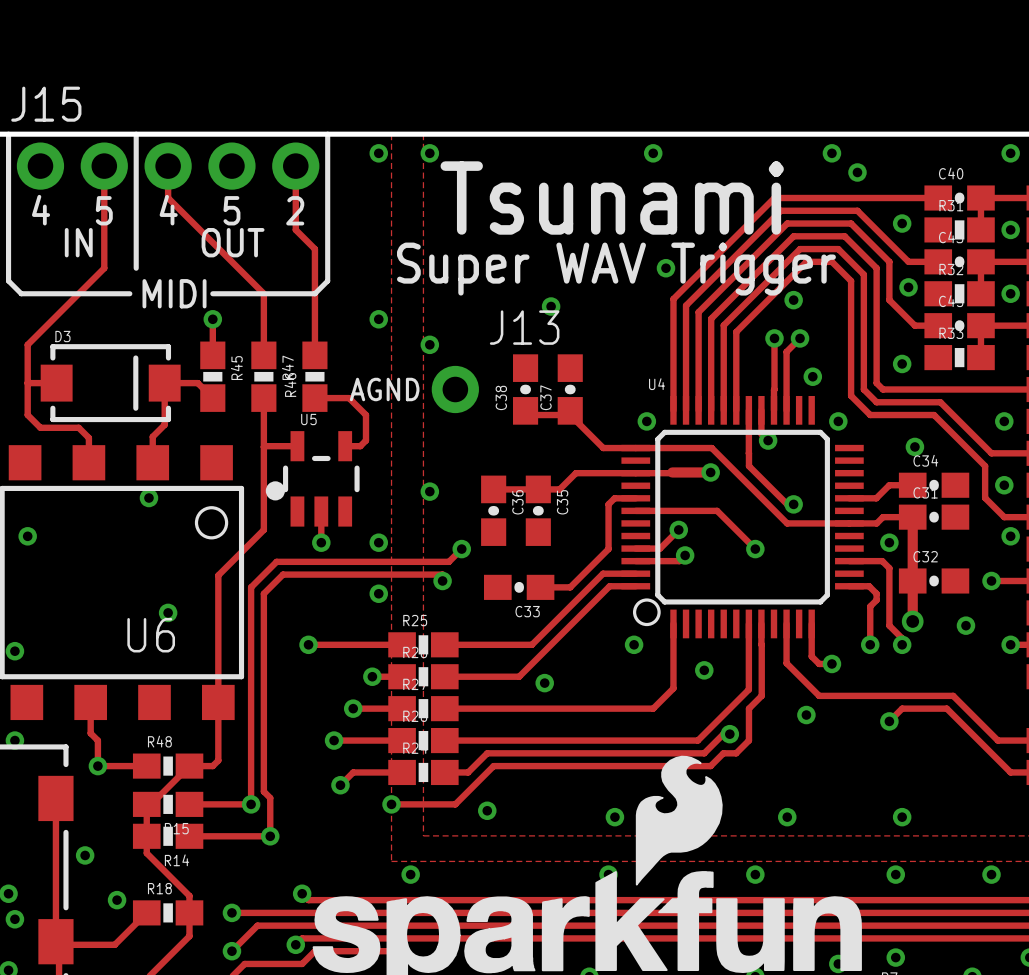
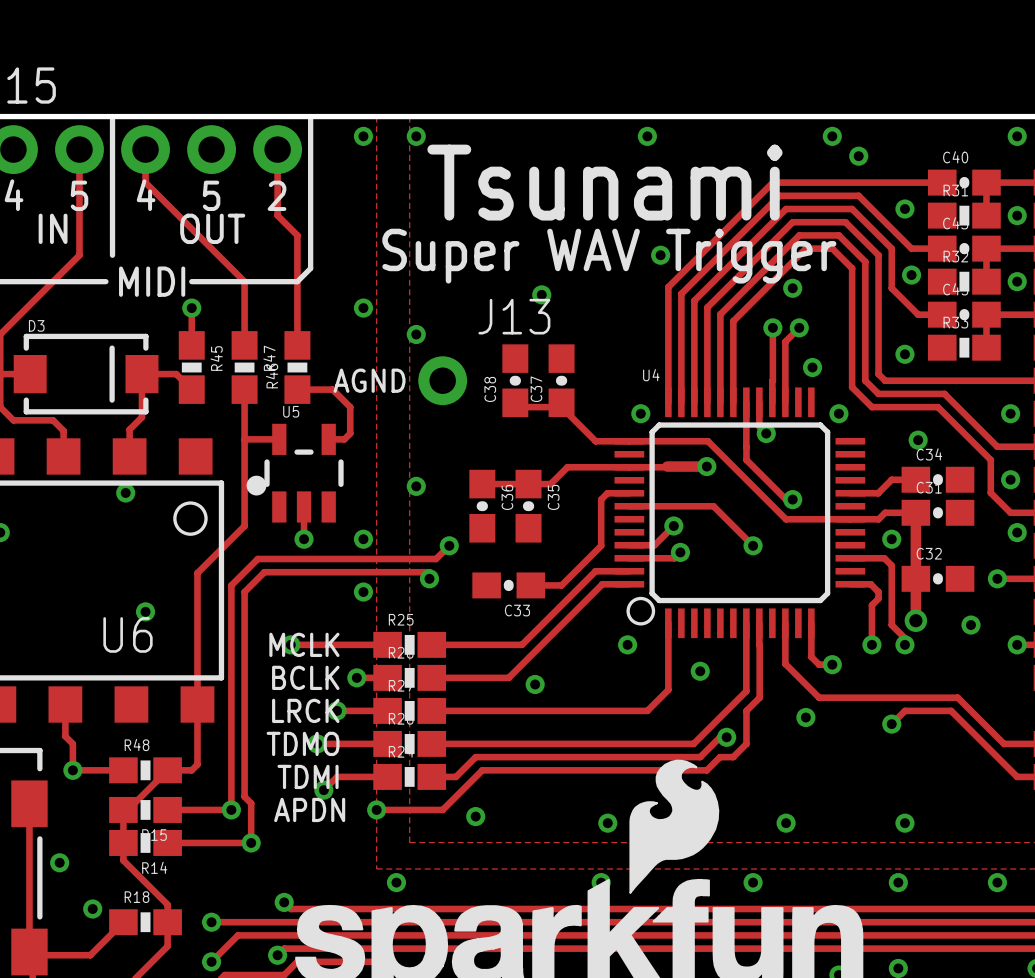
text: none -> MCLK (304, 644)
text: none -> BCLK (305, 677)
text: none -> LRCK (305, 710)
text: none -> TDMO (303, 743)
text: none -> TDMI (308, 776)
text: none -> APDN (309, 809)

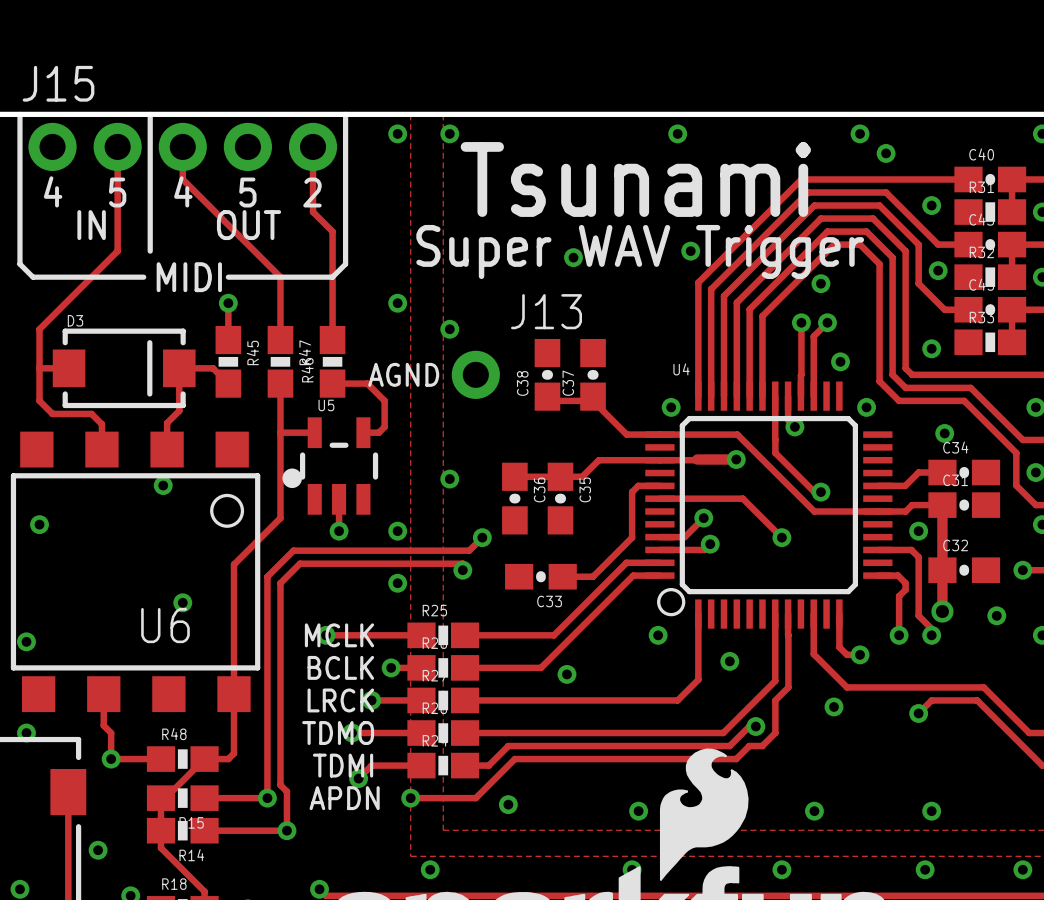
via position: (541, 294) -> (573, 257)

